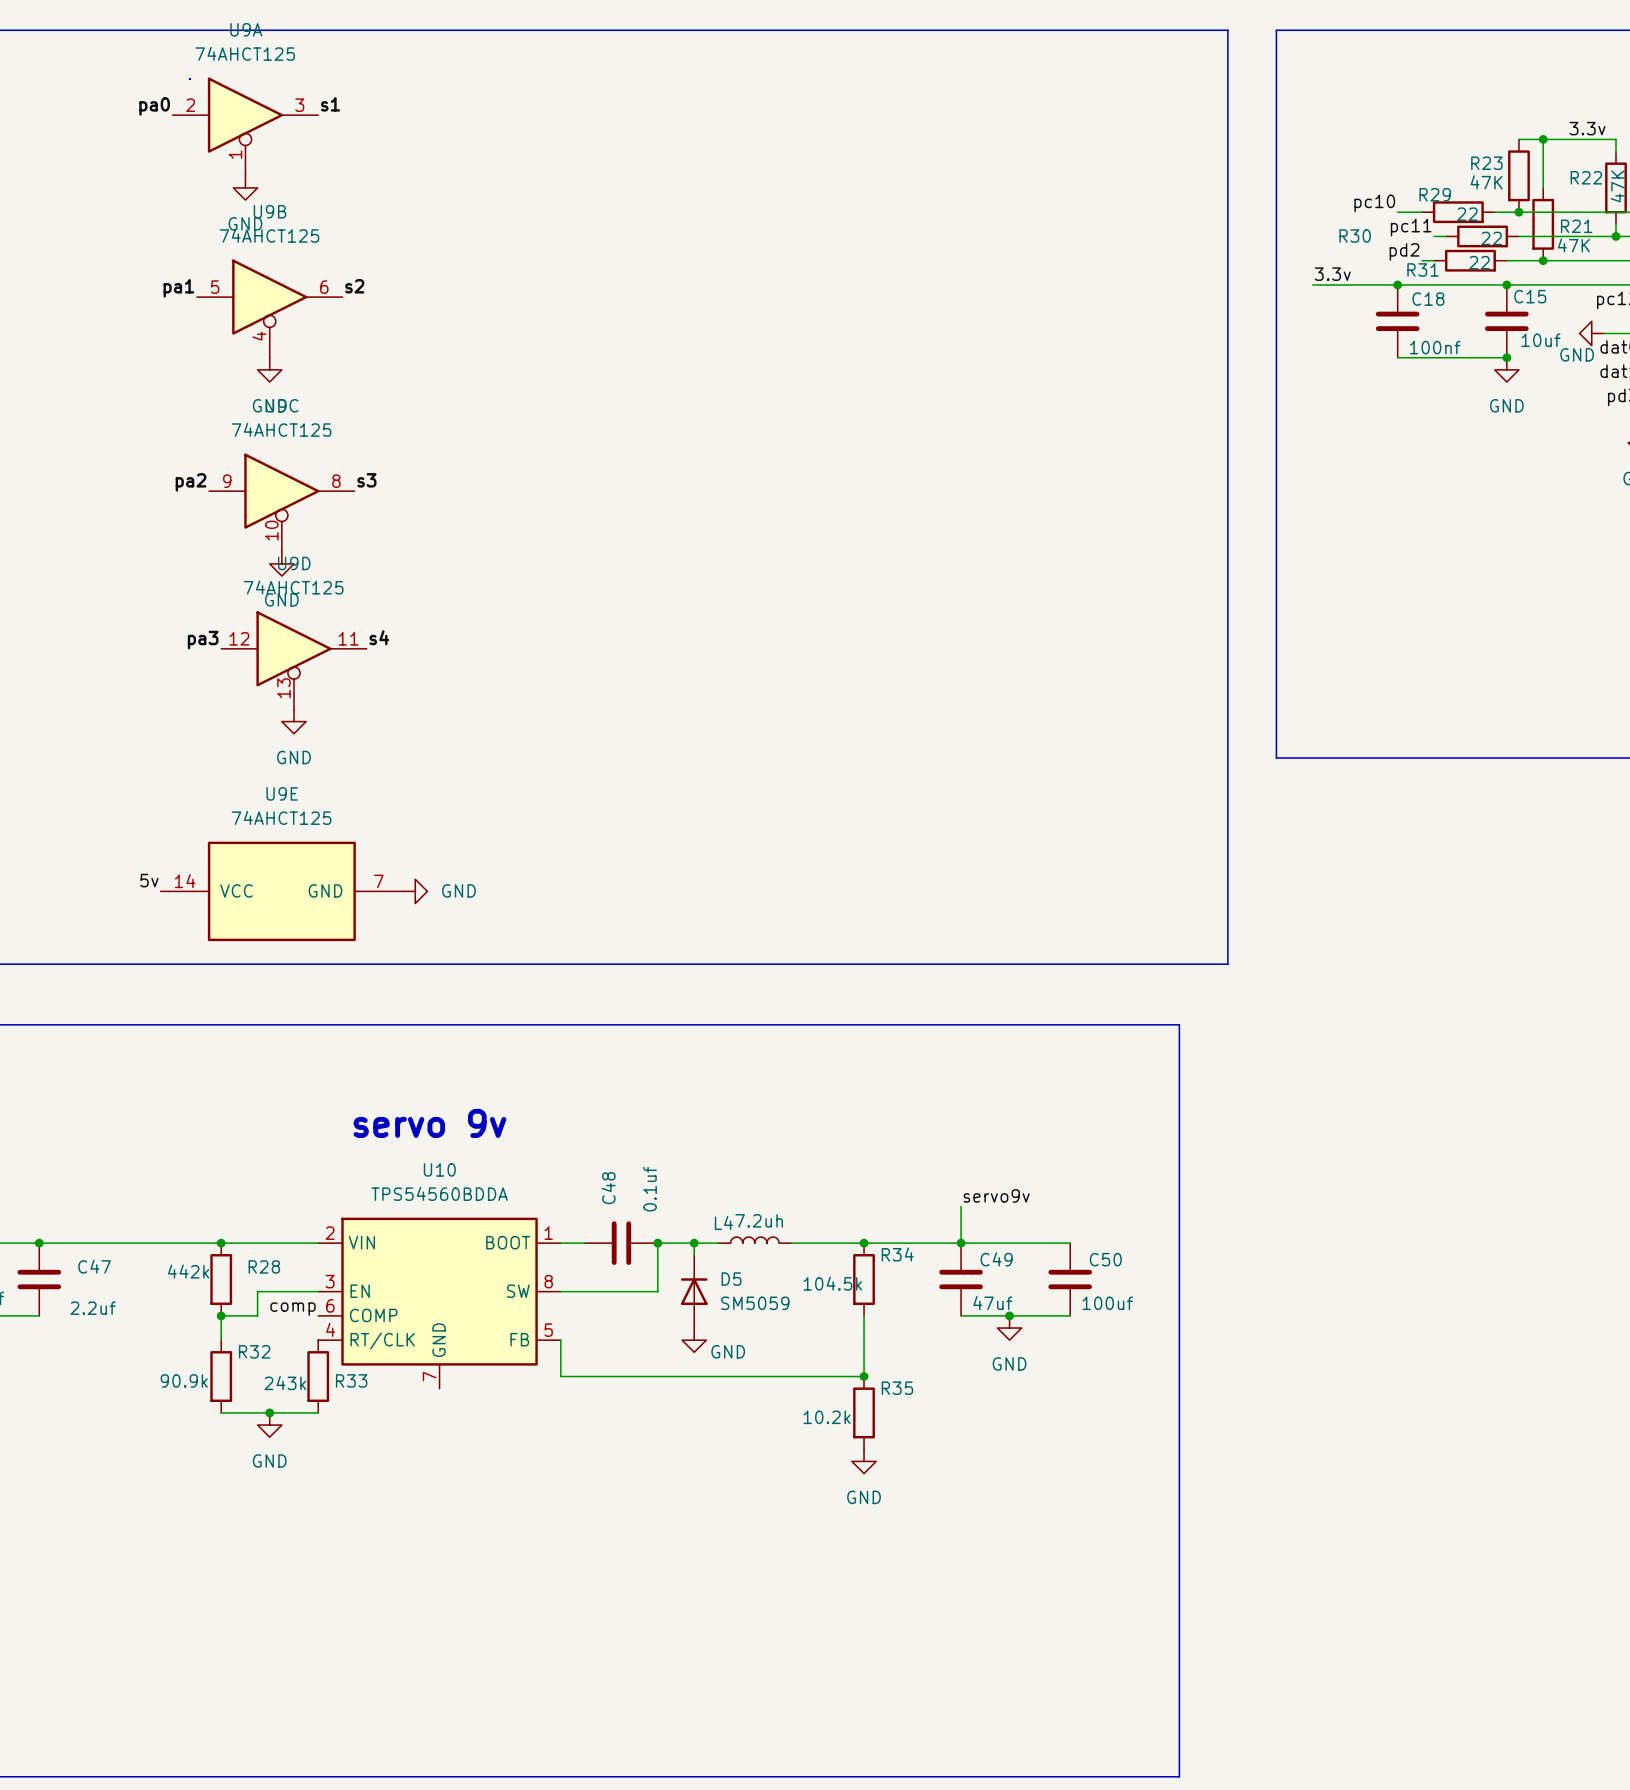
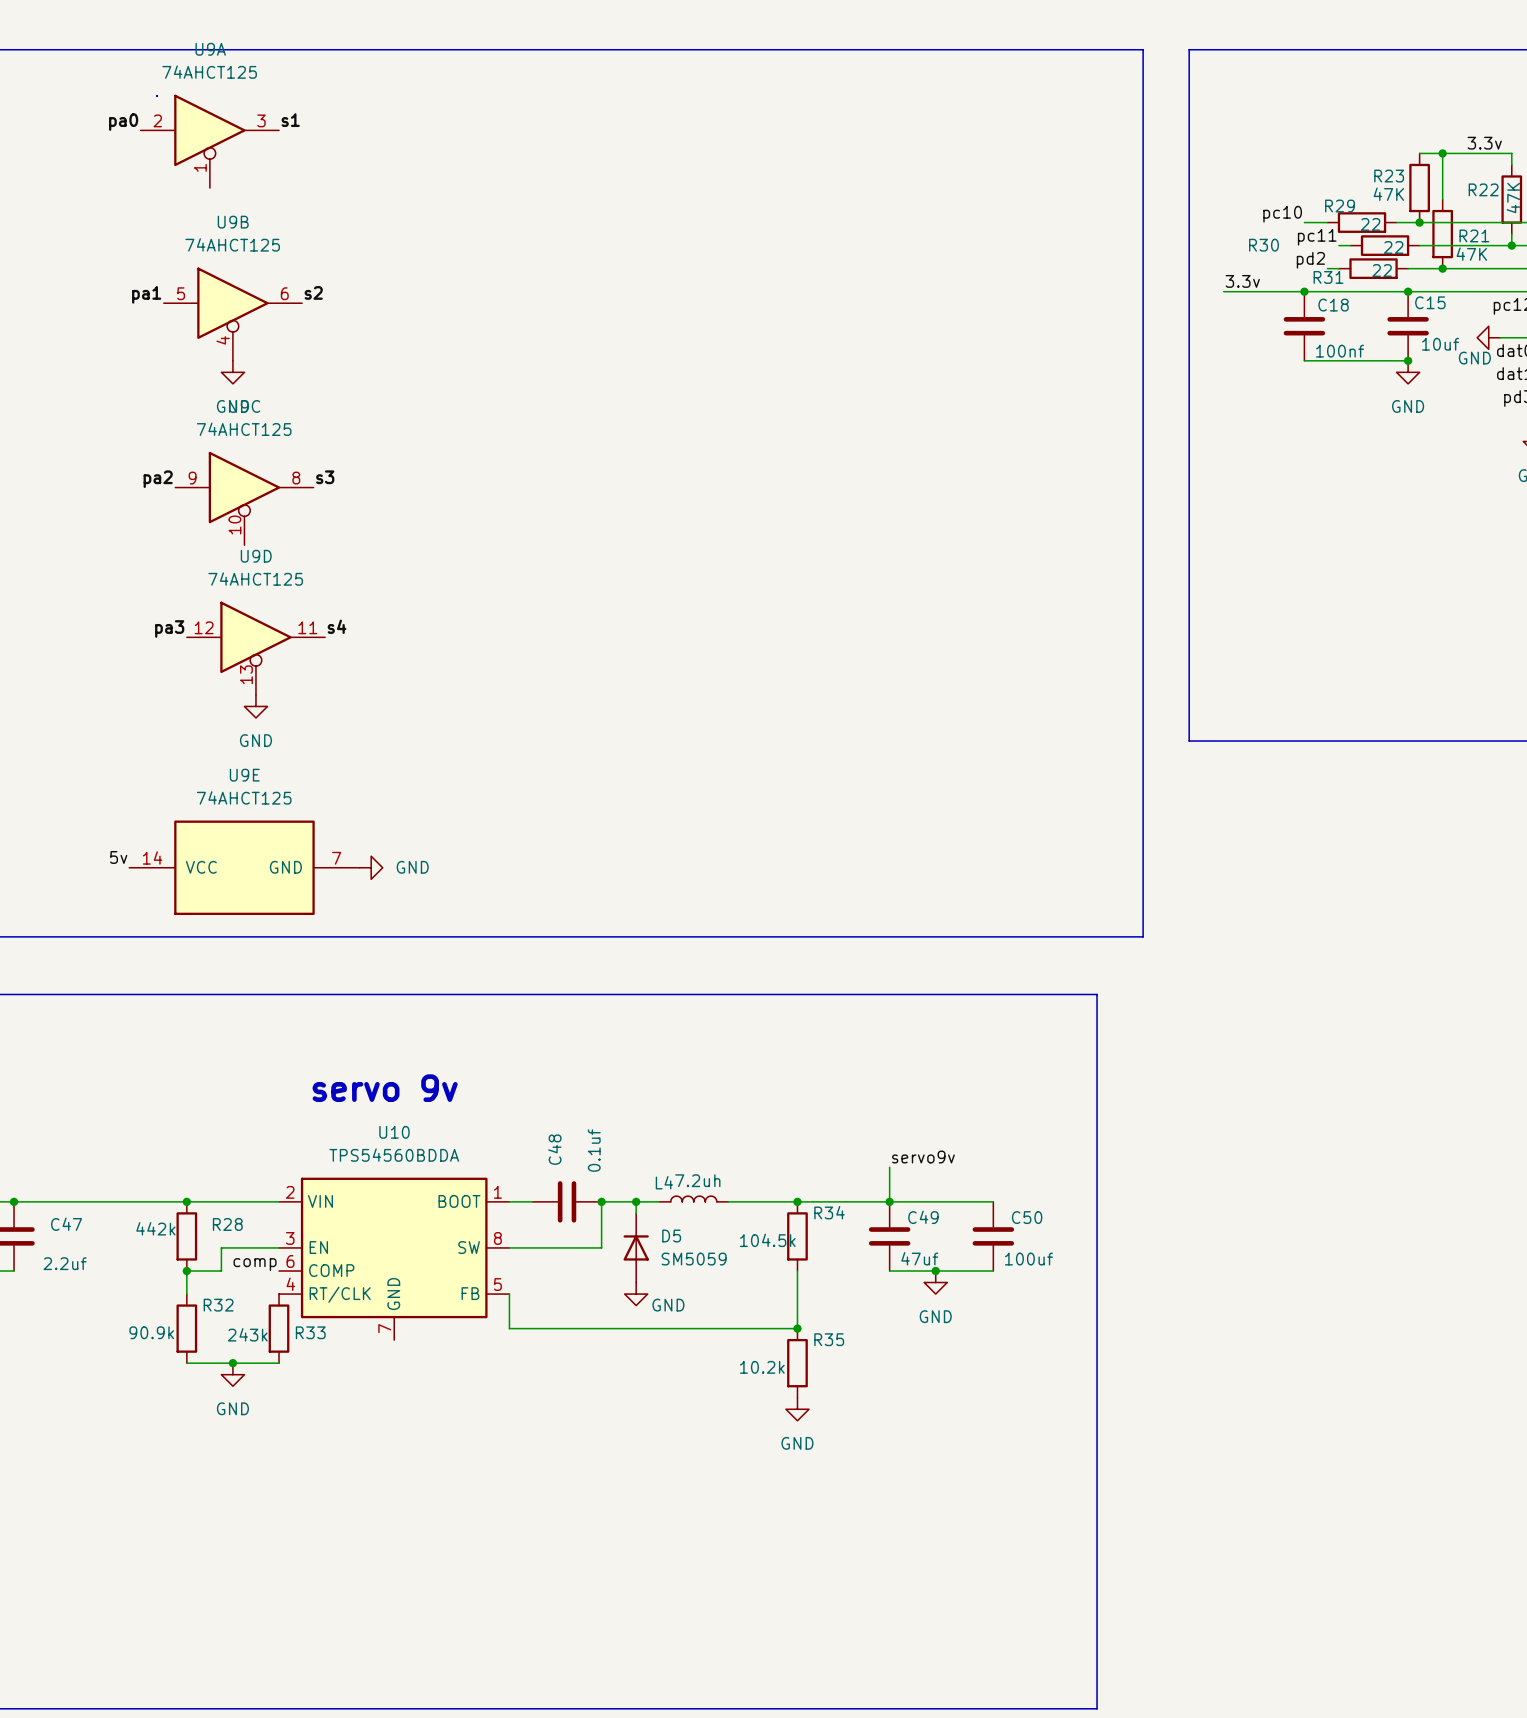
power symbol: GND (245, 187) -> none
power symbol: GND (281, 563) -> none

